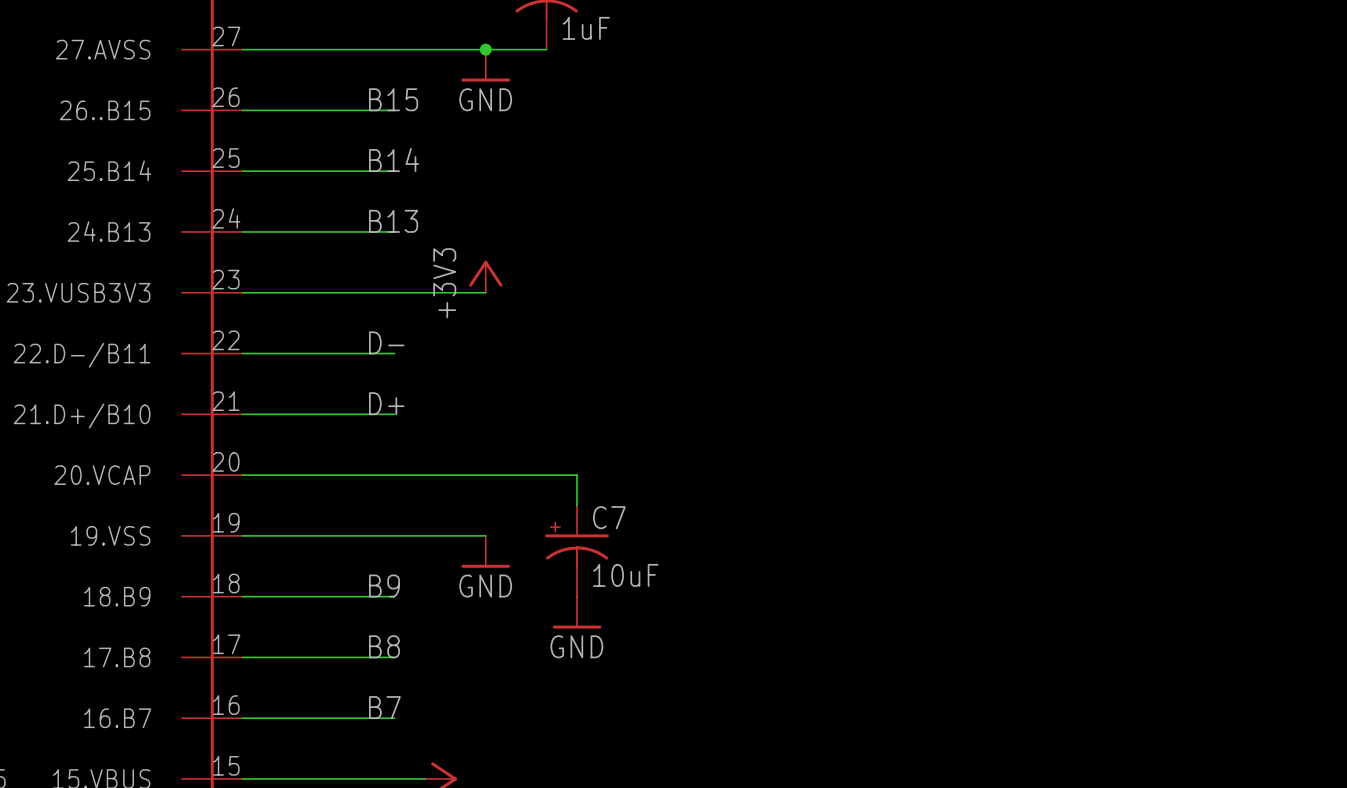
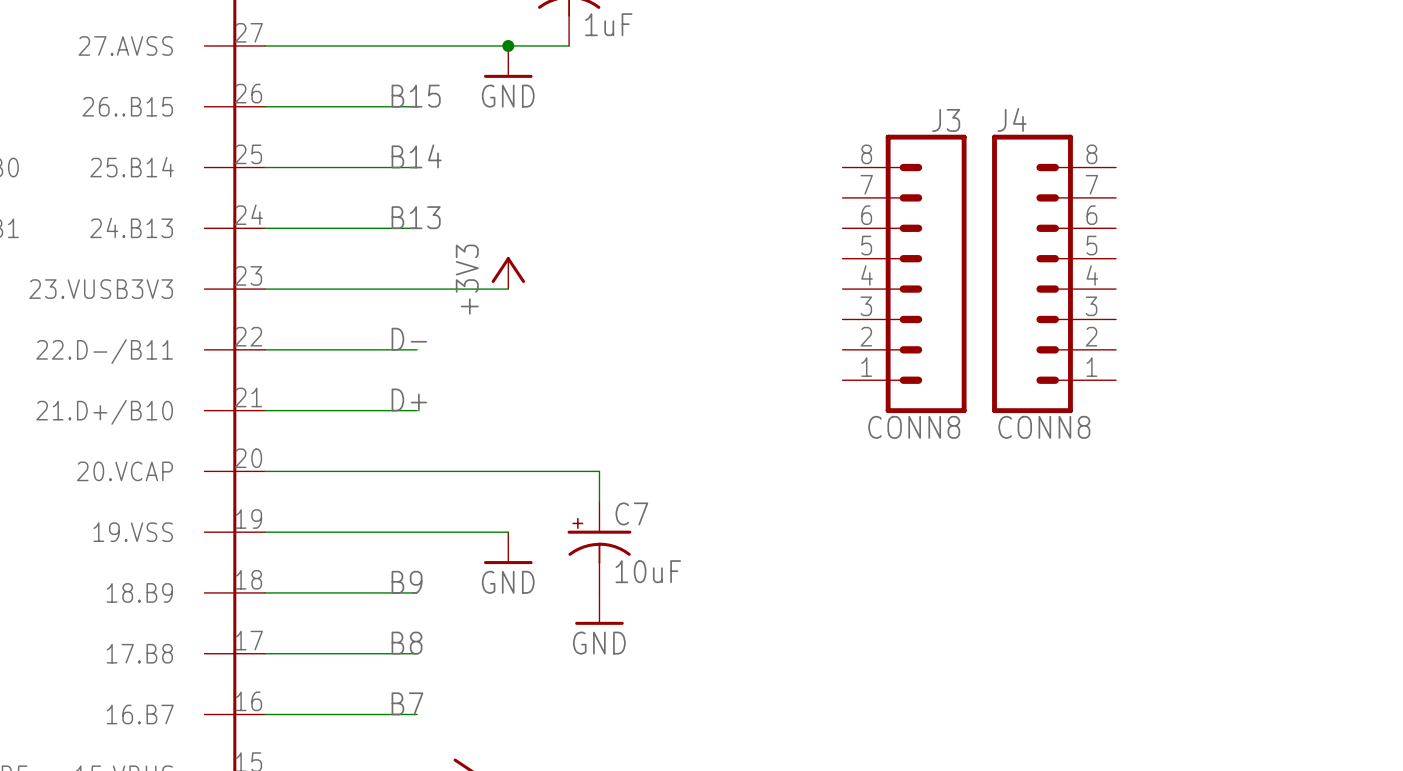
J3: none -> CONN8 (904, 273)
J4: none -> CONN8 (1054, 273)

